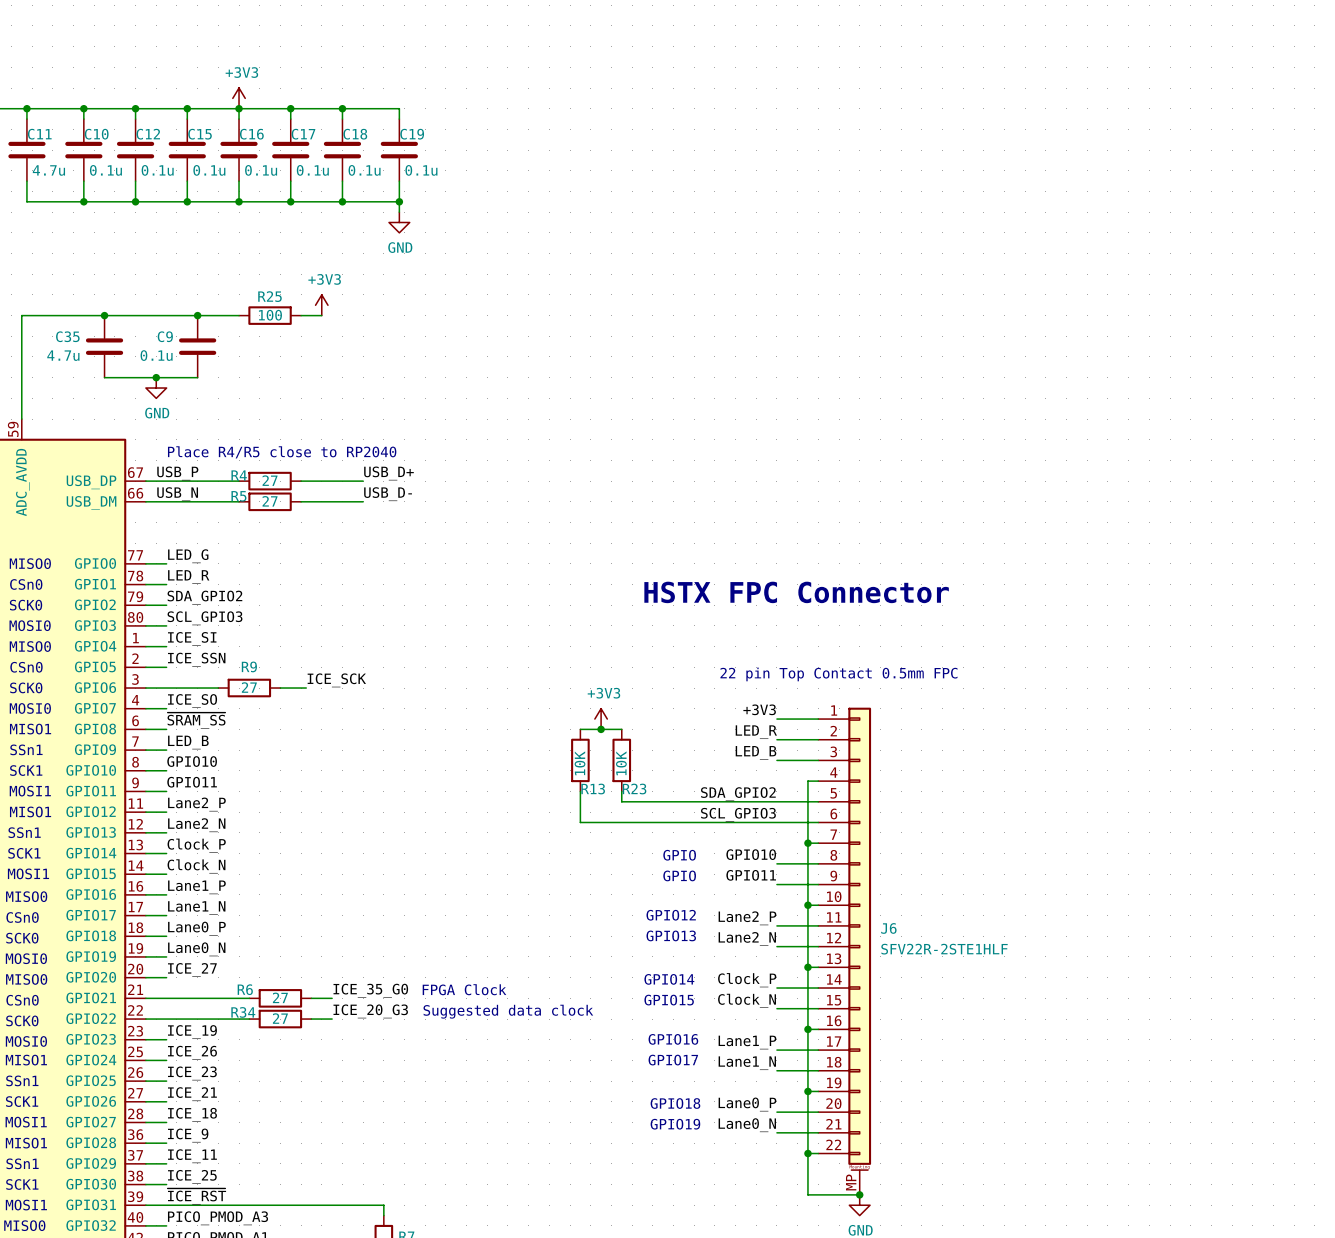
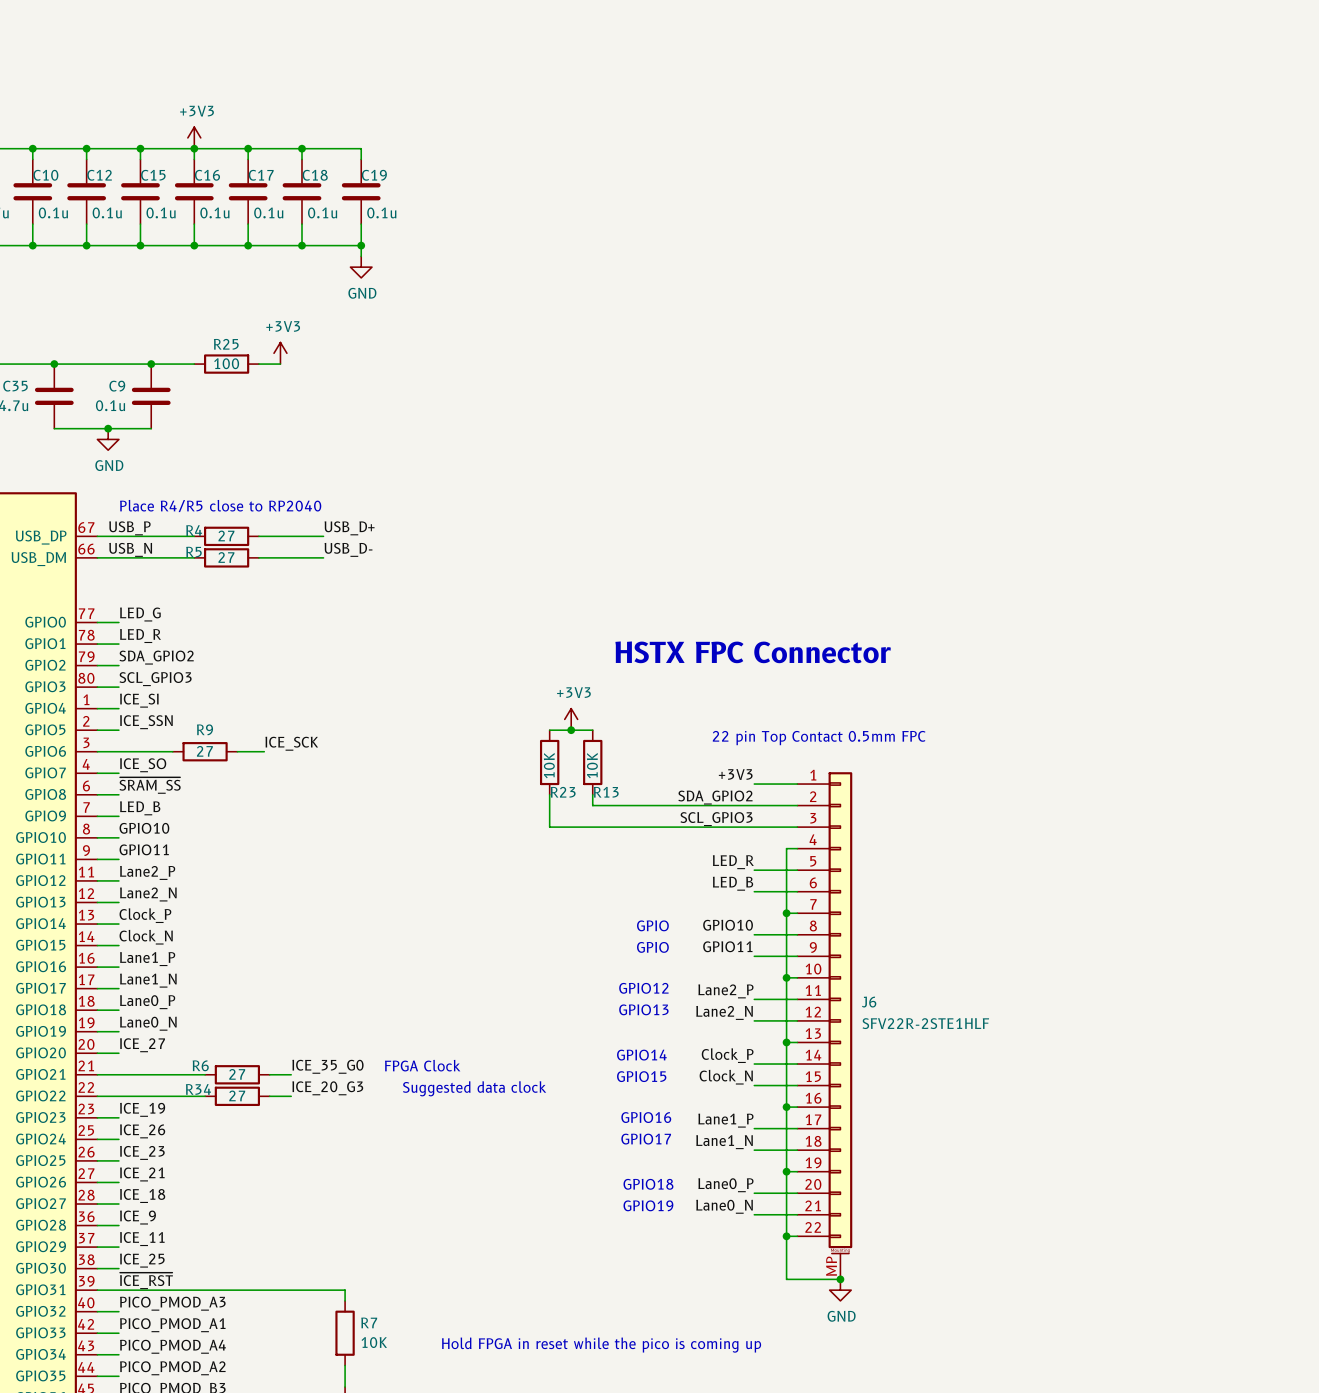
wire: none -> (549, 730) (592, 730)
junction: none -> (571, 730)
power symbol position: +3V3 (601, 719) -> +3V3 (571, 719)
wire: (580, 729) (621, 729) -> (549, 794) (549, 827) (754, 827)
junction: (601, 729) -> none
label: LED_R (756, 732) -> SDA_GPIO2 (715, 797)
label: LED_B (755, 752) -> SCL_GPIO3 (716, 819)
R13 position: (580, 760) -> (592, 762)
R23 position: (621, 760) -> (549, 762)
wire: (580, 791) (580, 822) (776, 822) -> none
wire: (621, 791) (621, 801) (776, 801) -> (592, 794) (592, 805) (754, 805)
label: SDA_GPIO2 (738, 794) -> LED_R (733, 862)
label: SCL_GPIO3 (738, 814) -> LED_B (733, 883)

